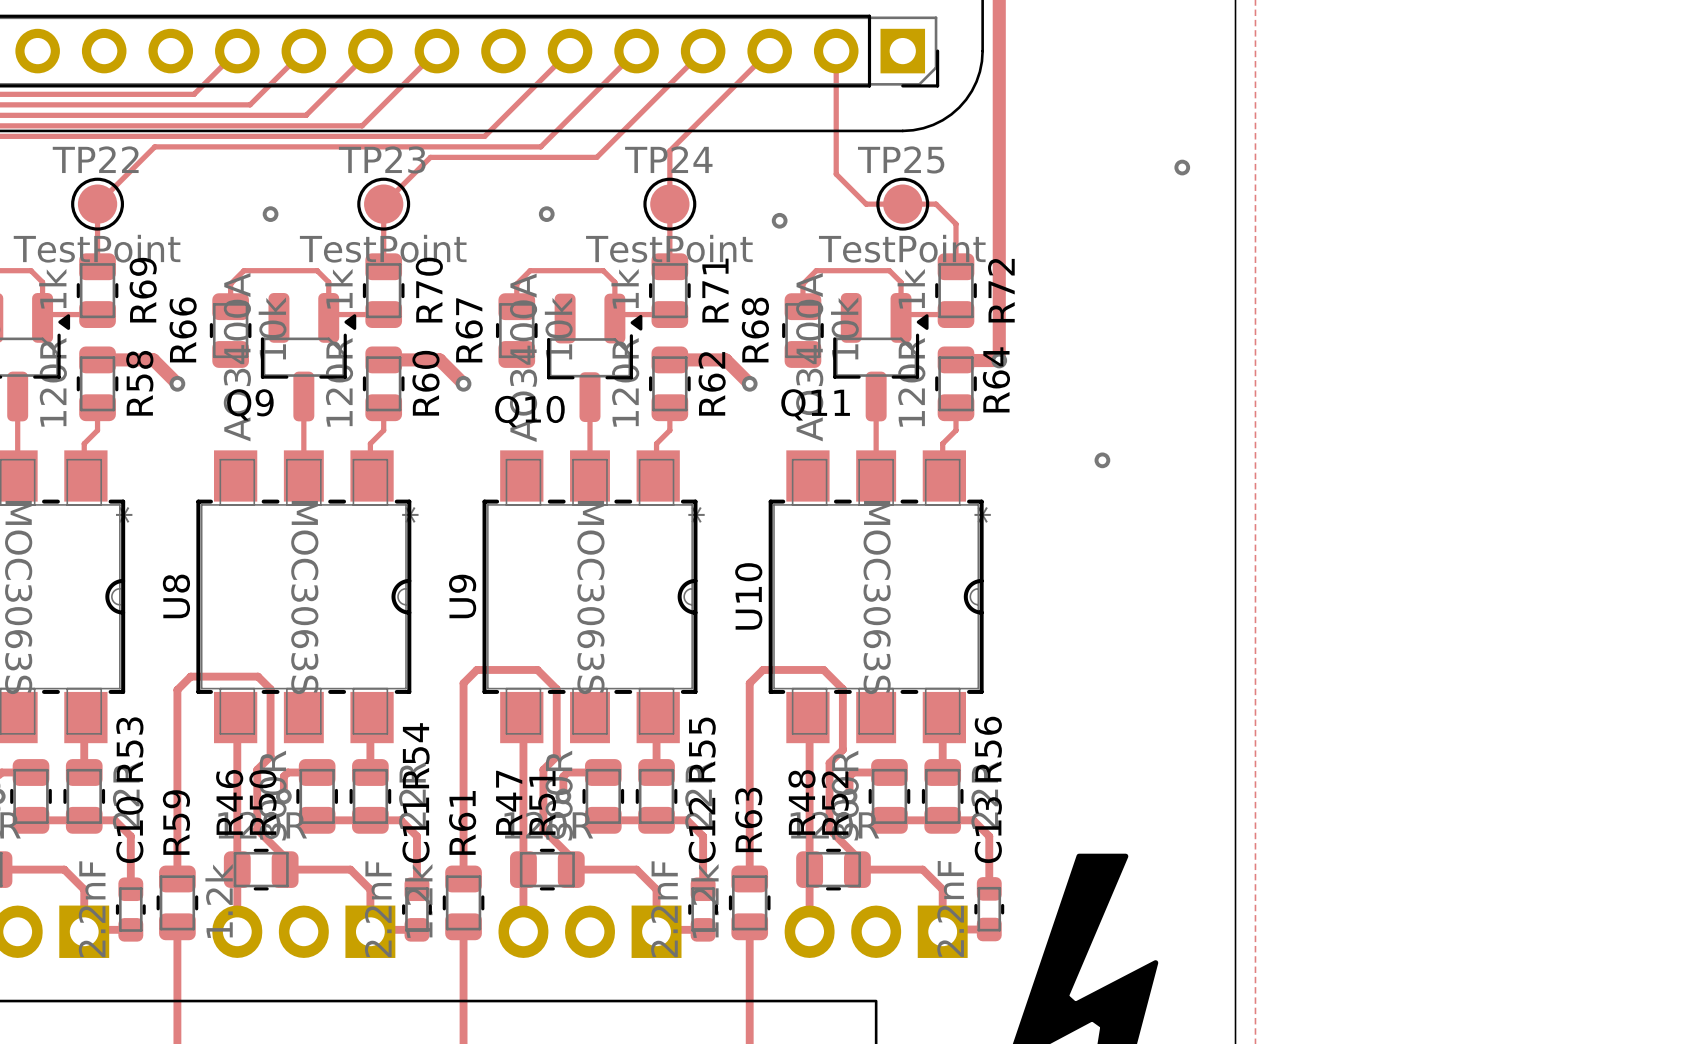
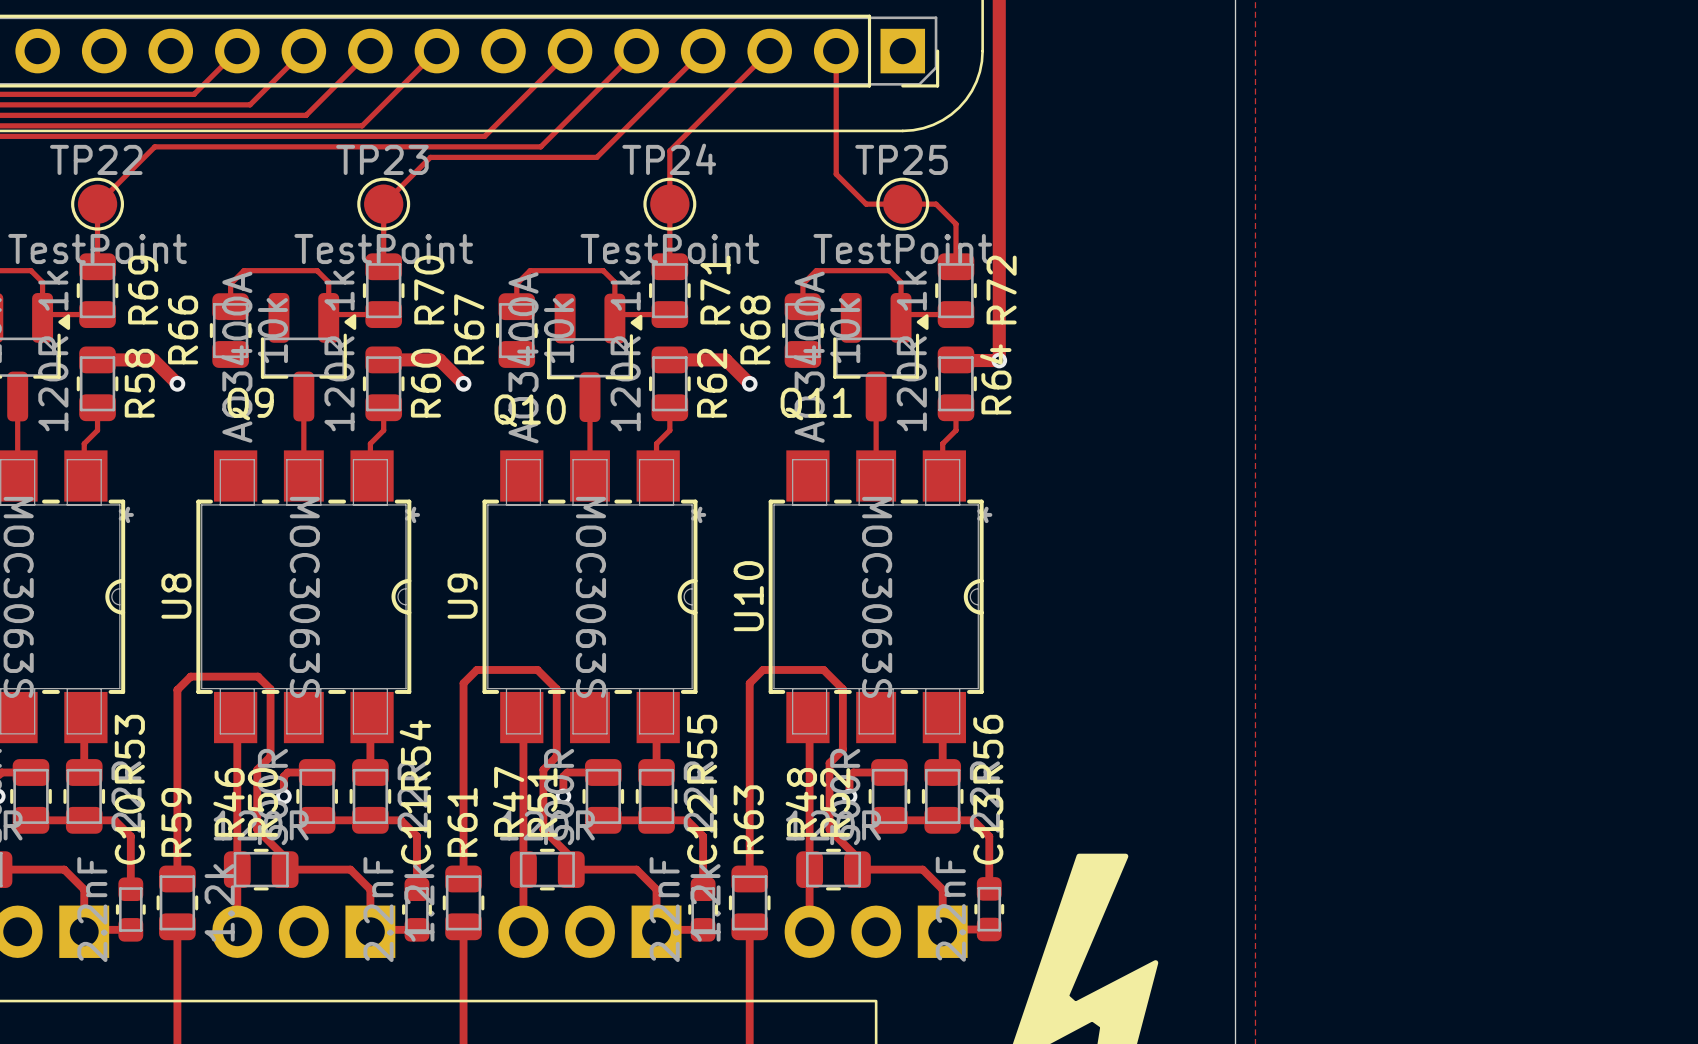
via: (1182, 167) -> none
via: (270, 214) -> none
via: (546, 214) -> none
via: (779, 220) -> none
via: (1102, 460) -> none

